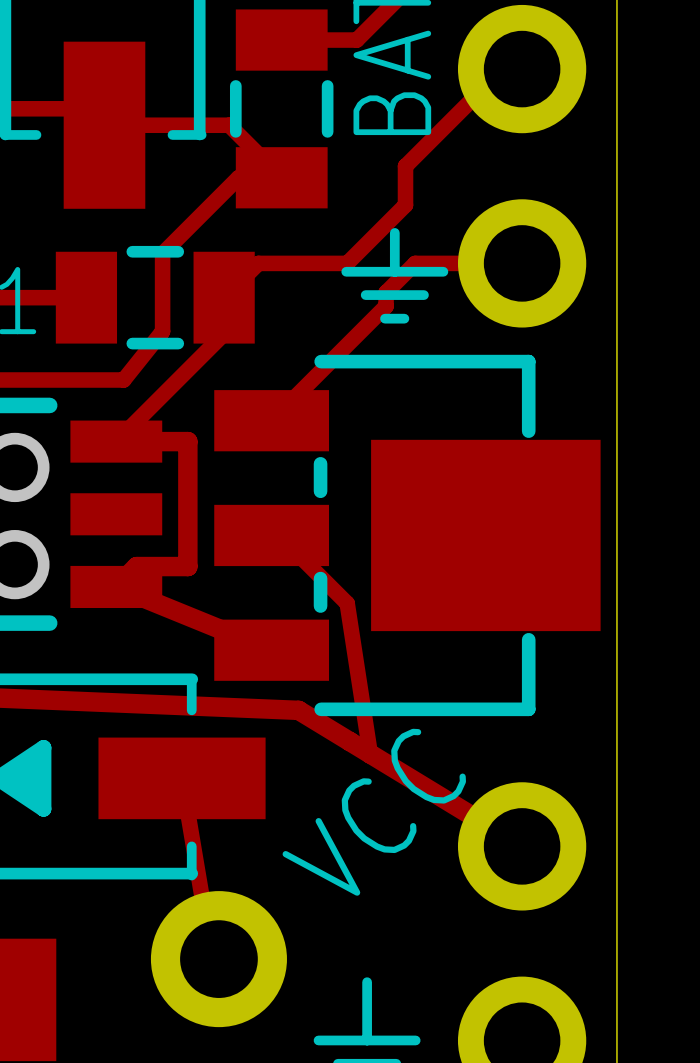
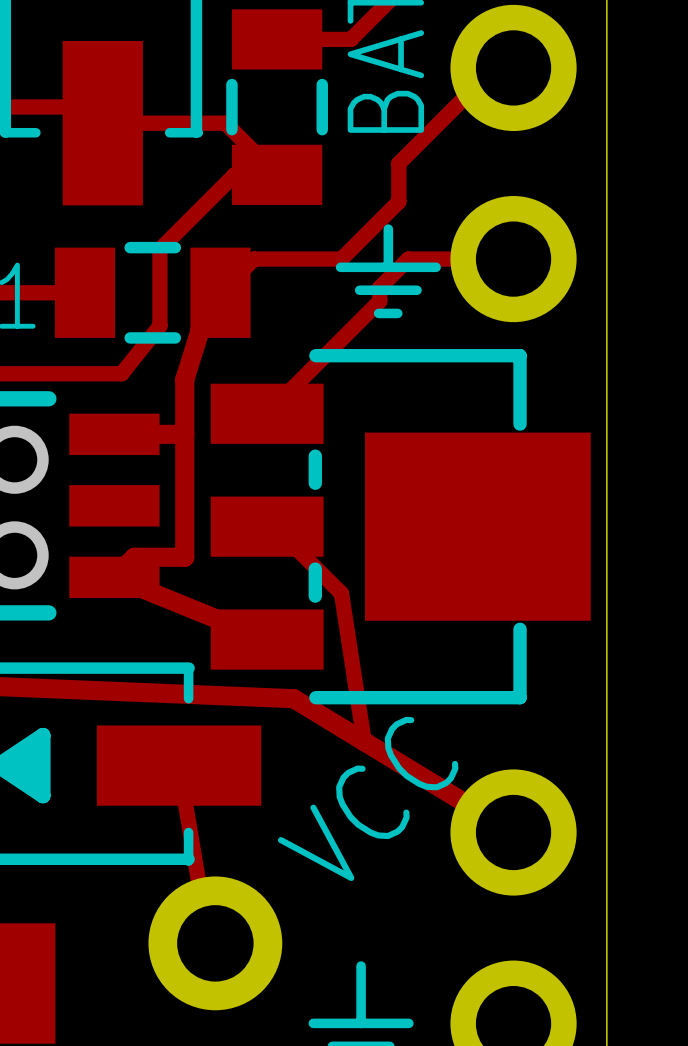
track: (224, 297) (224, 333) (116, 441) -> (220, 292) (210, 296) (184, 379) (184, 434)

